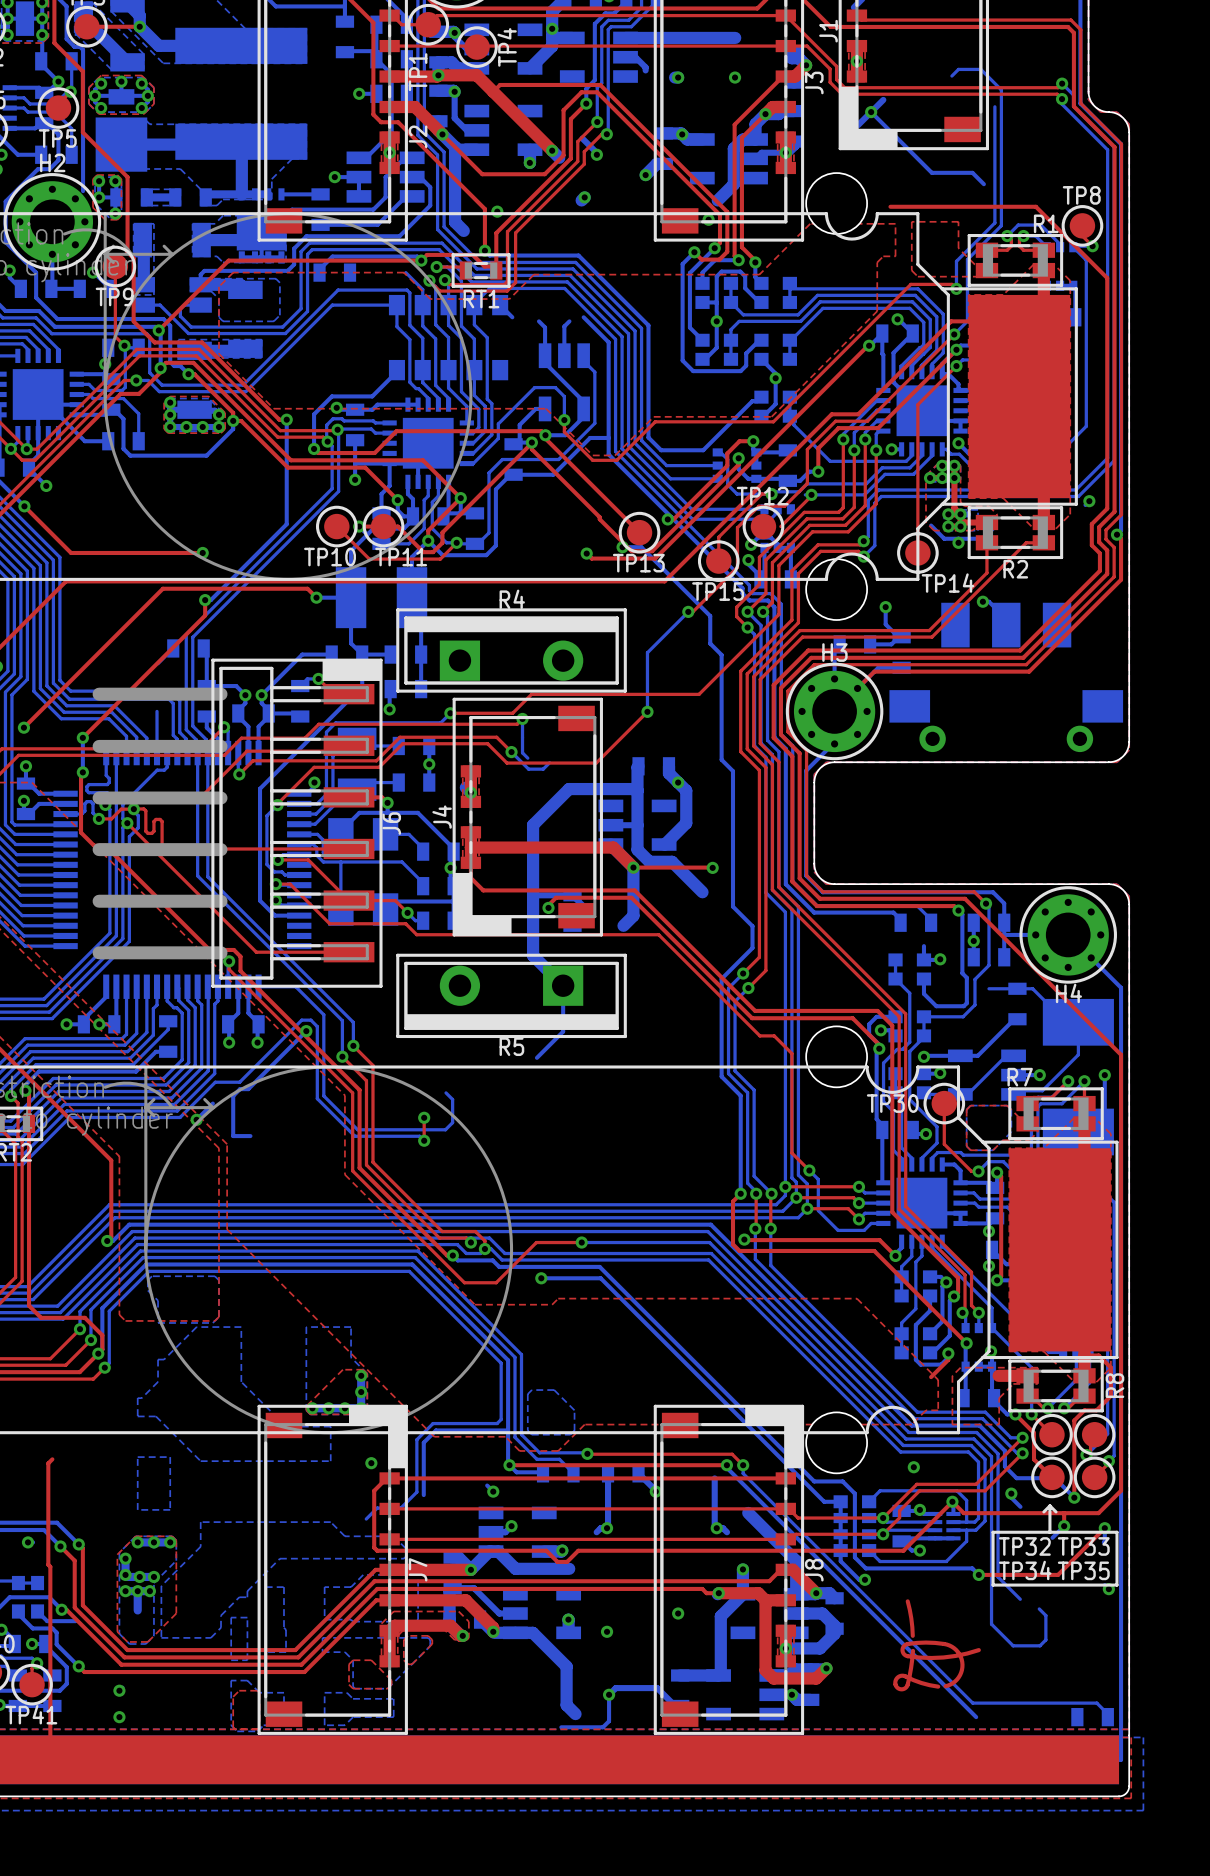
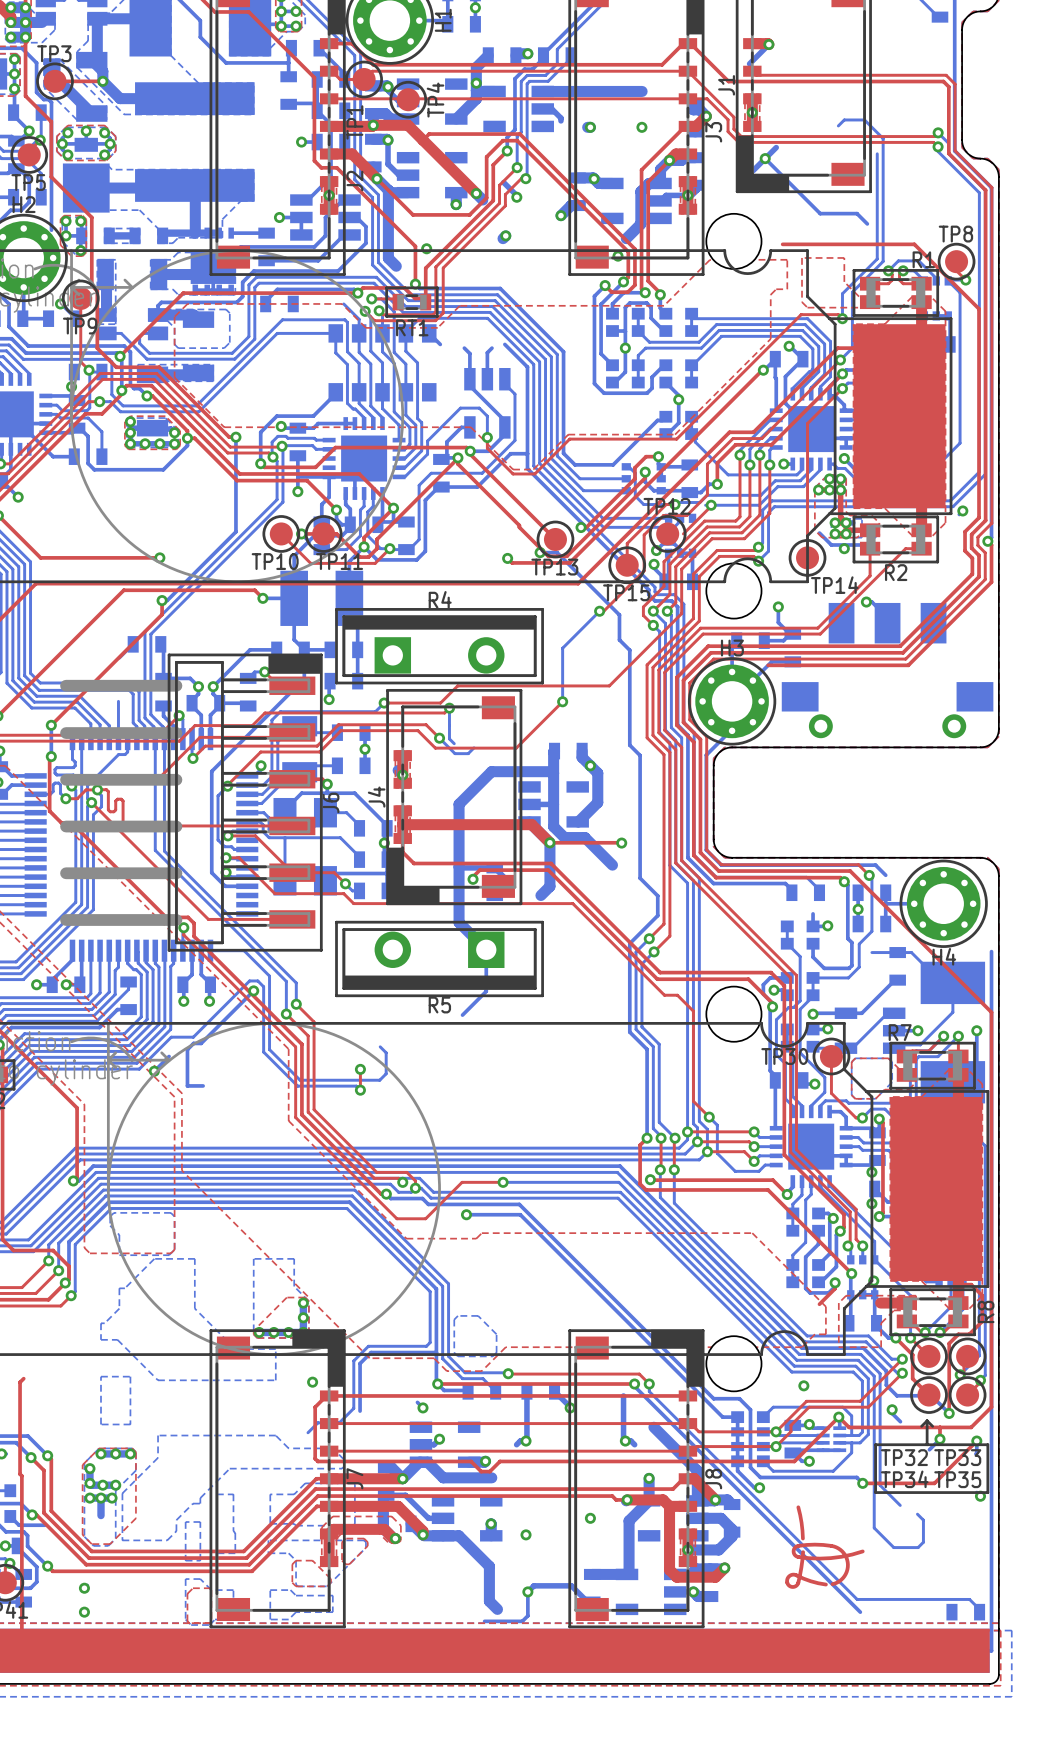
top track: (874, 671) (857, 688) -> none
bottom track: (1004, 903) (1004, 922) -> none
bottom track: (1091, 957) (1121, 987) -> none

